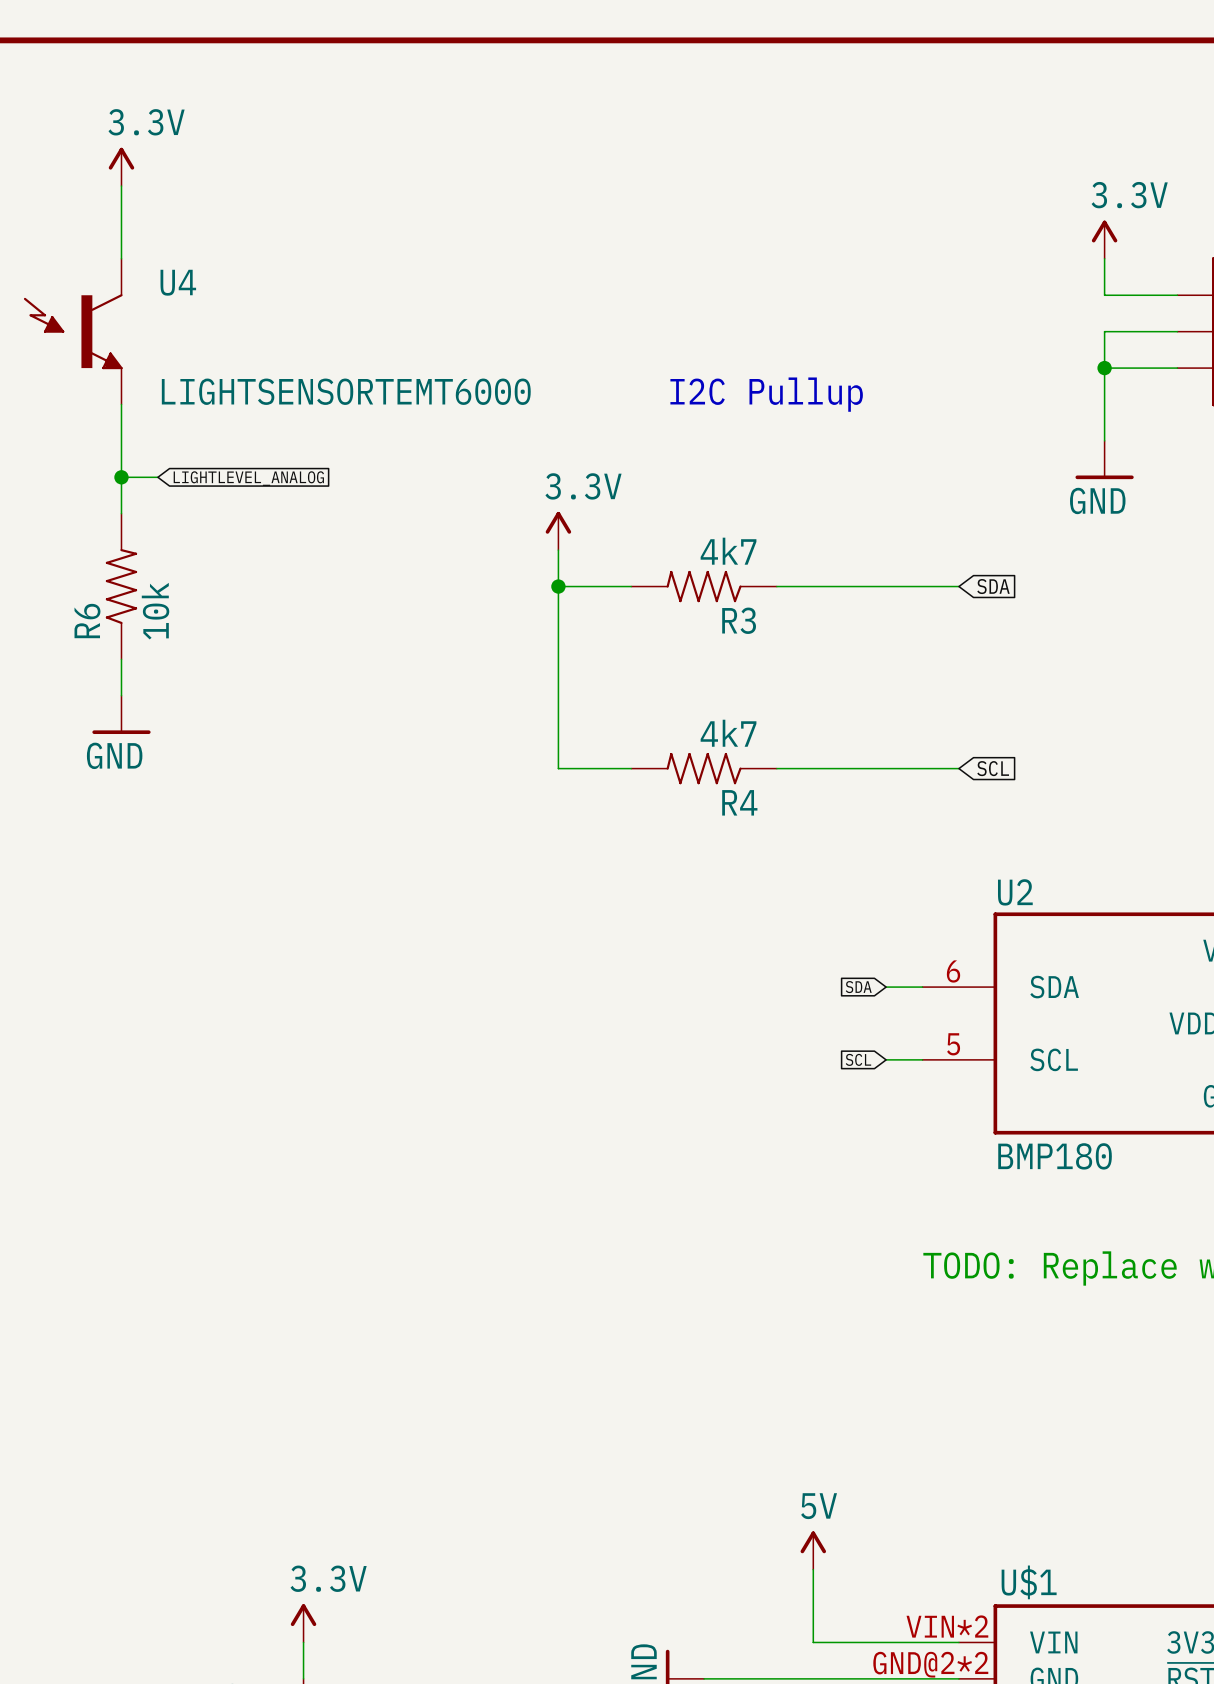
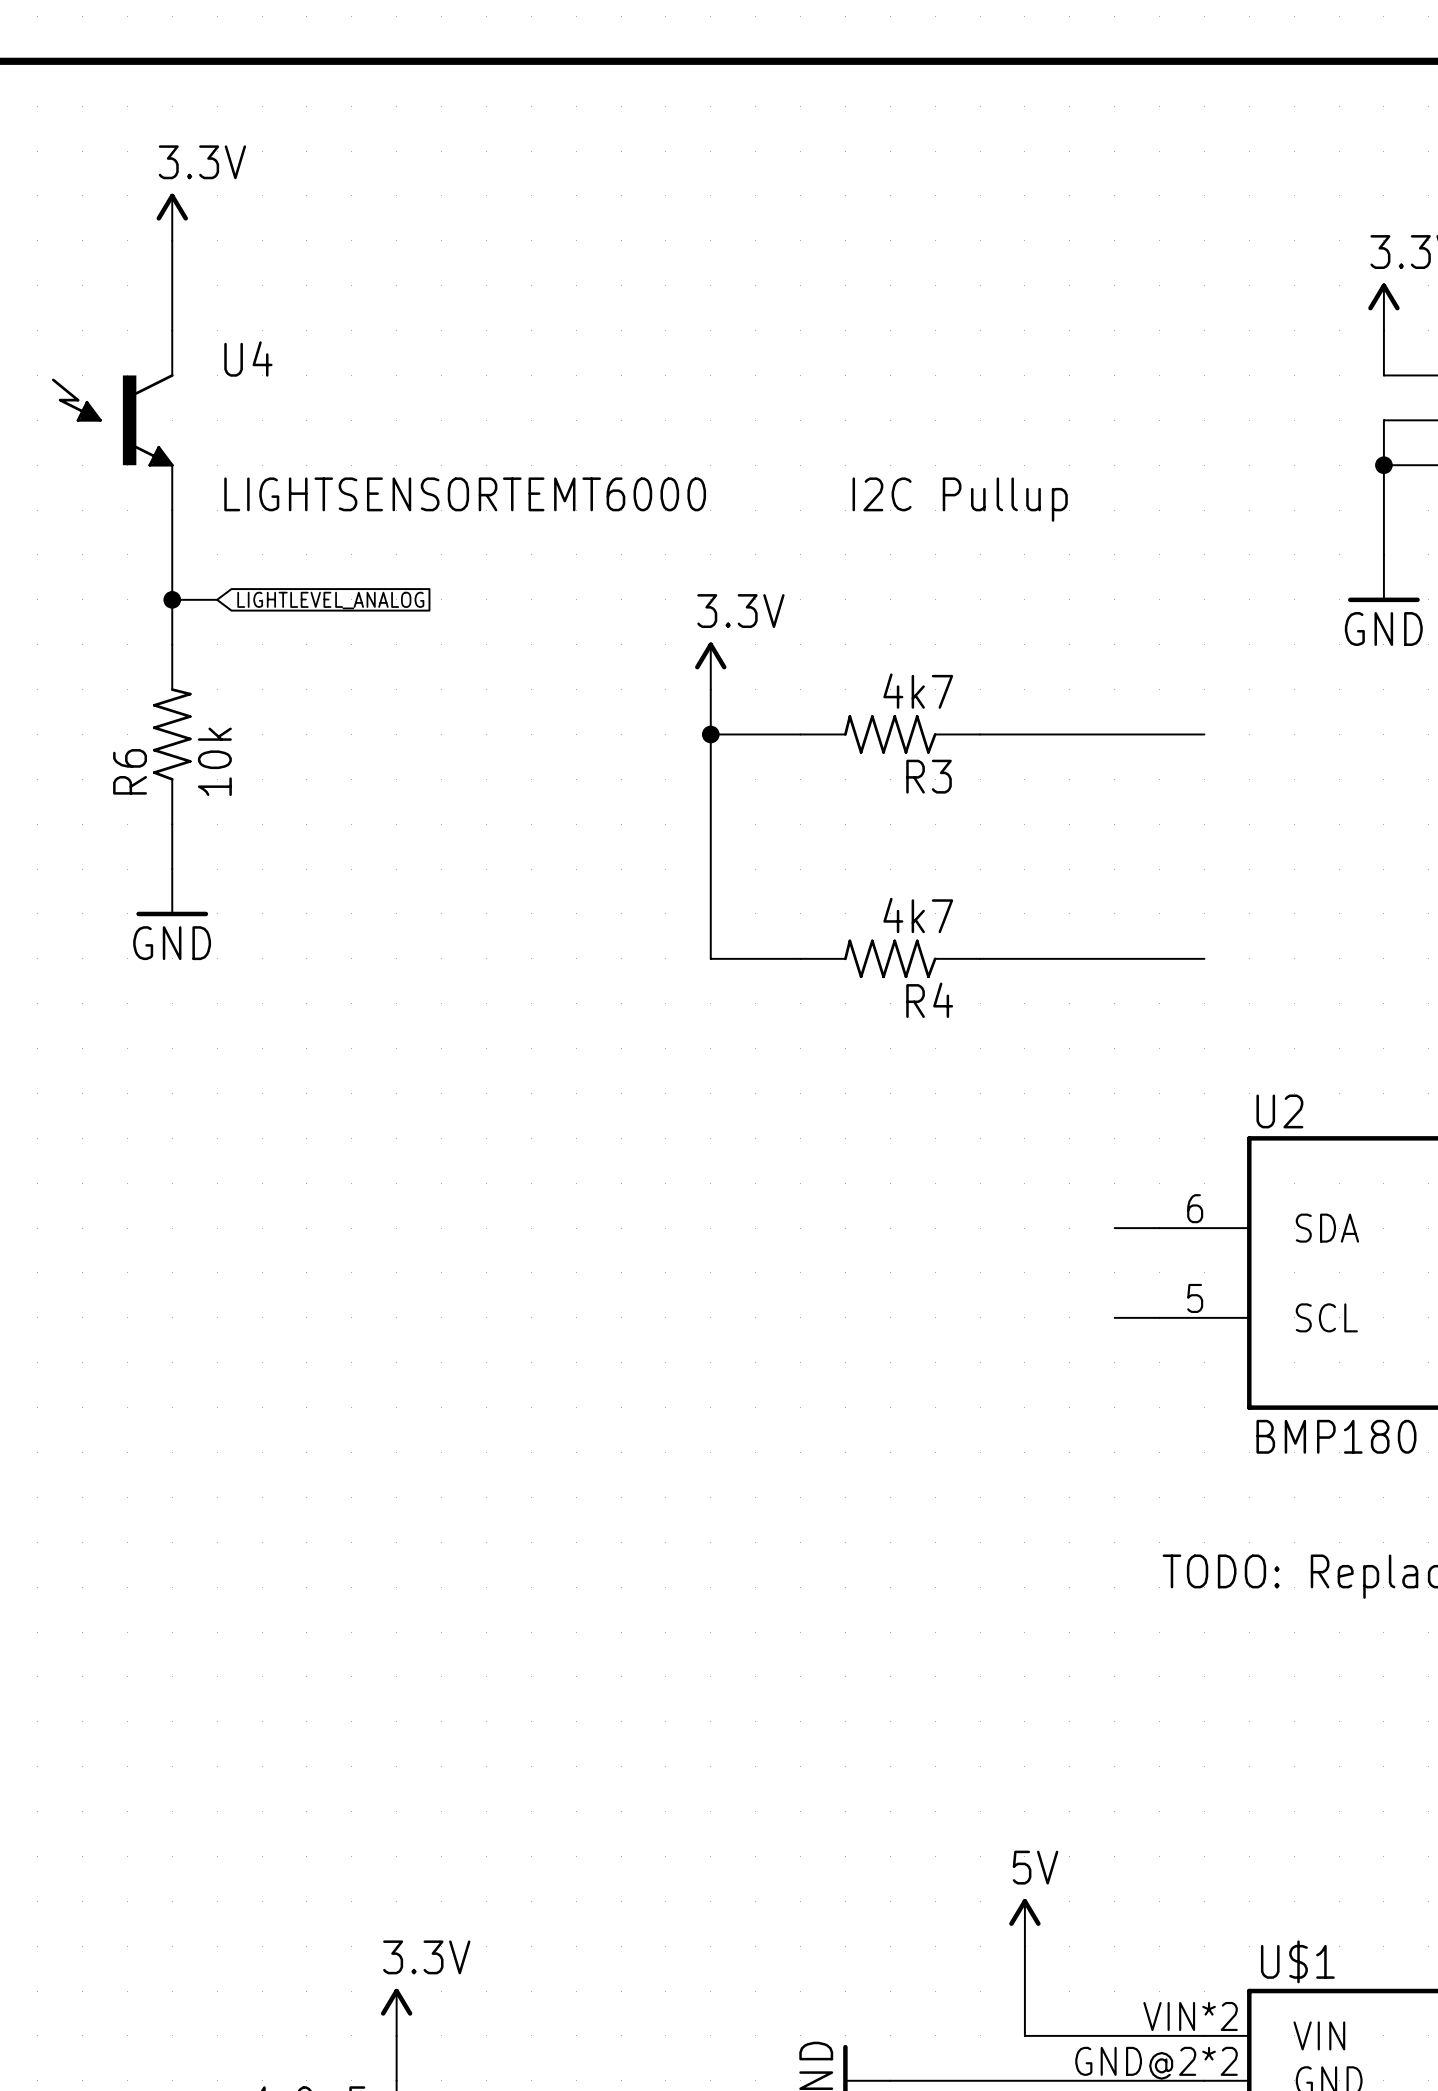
global label: SDA (993, 586) -> none
global label: SCL (993, 768) -> none
global label: SDA (858, 987) -> none
global label: SCL (858, 1059) -> none

